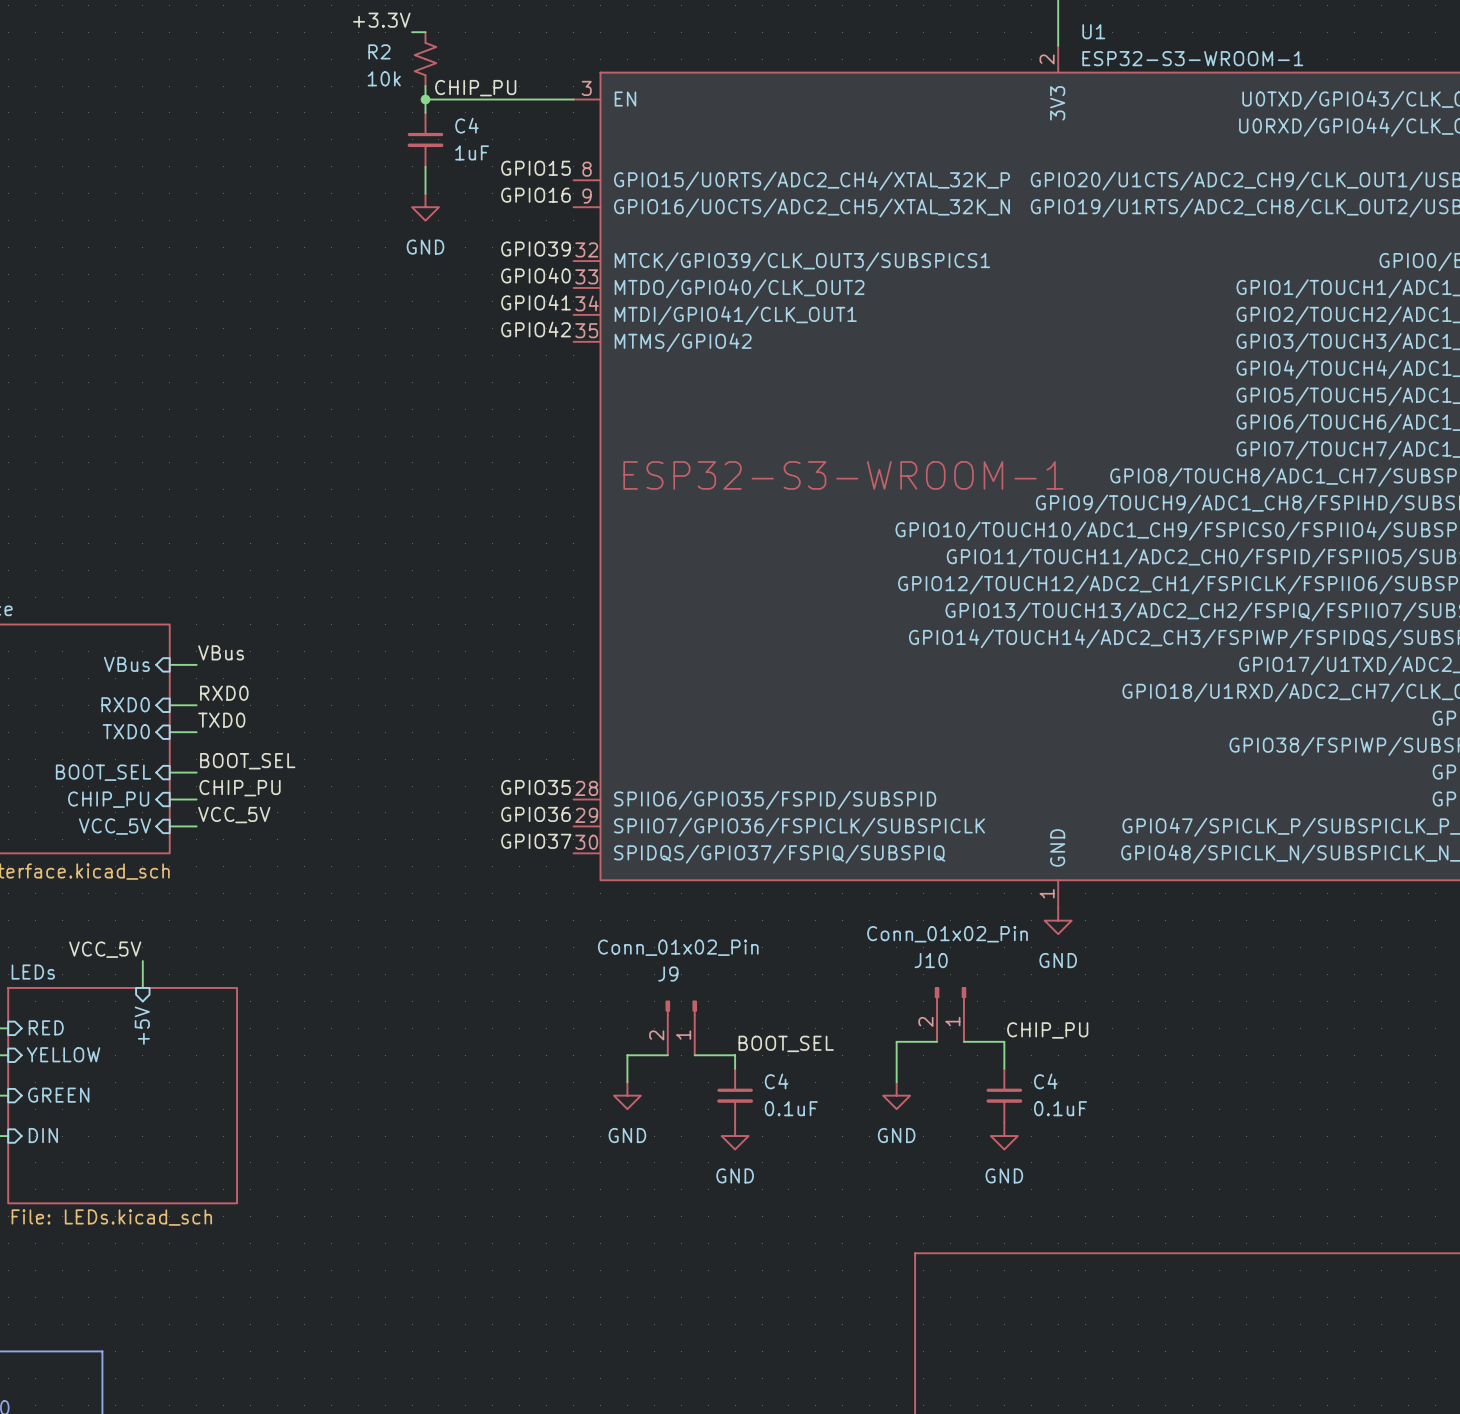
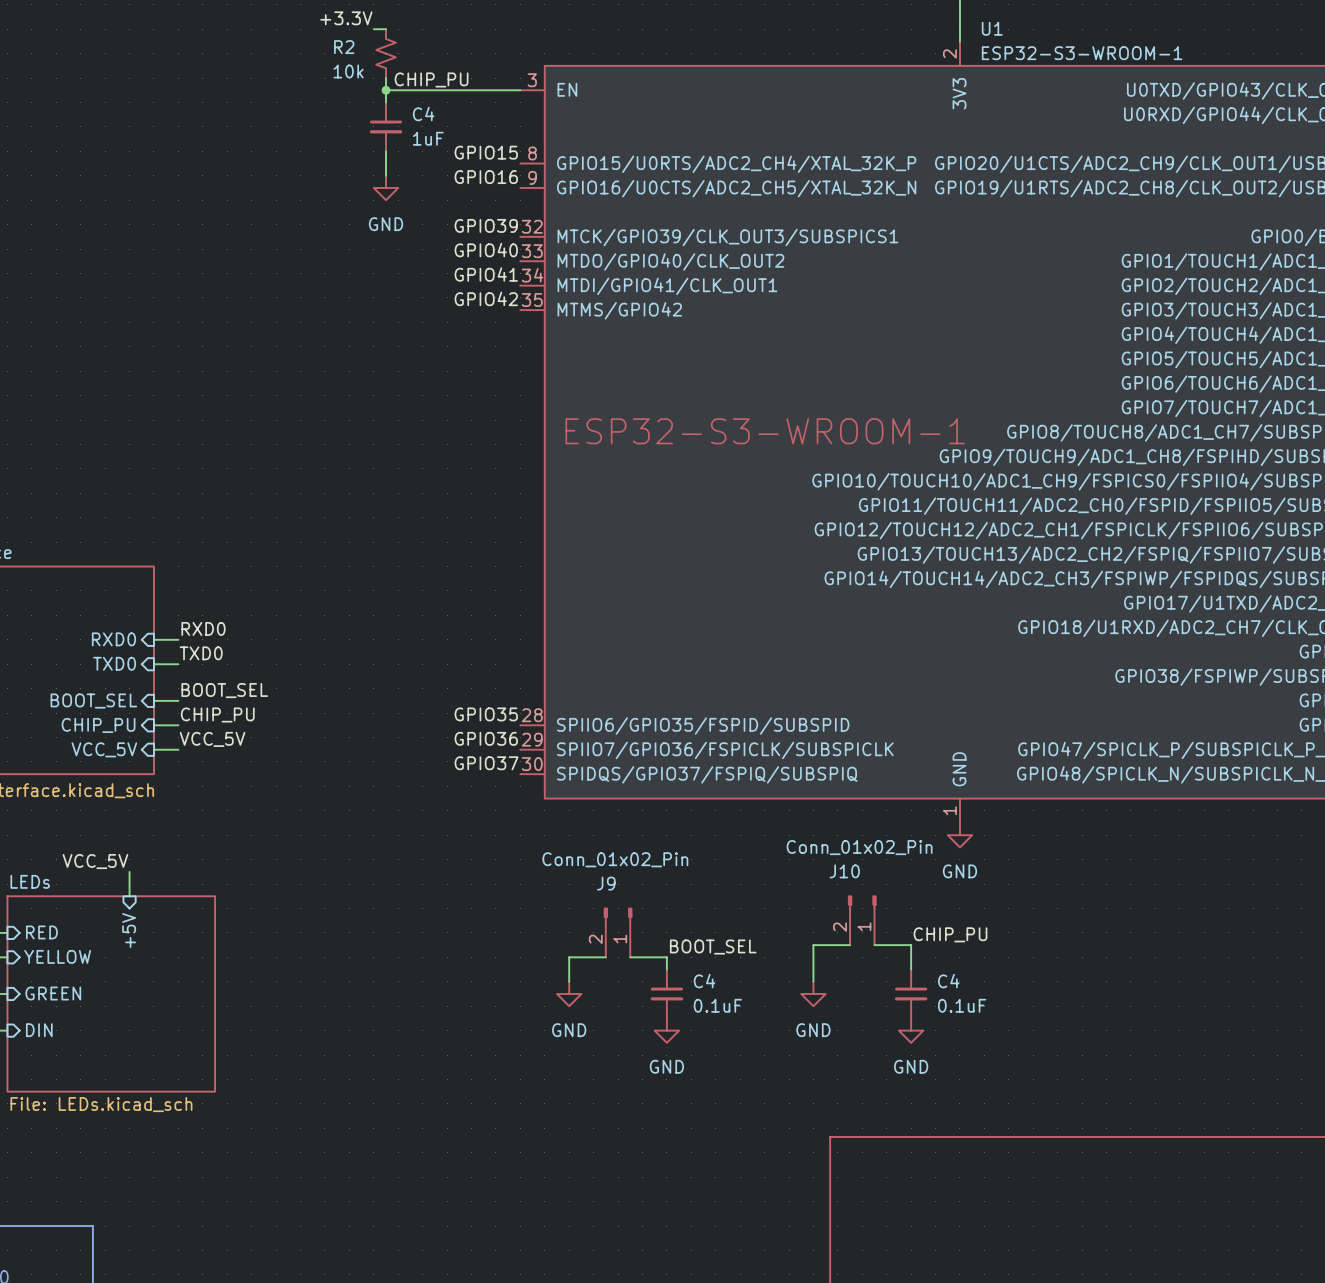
label: VBus (221, 652) -> none
sheet pin: VBus (126, 664) -> none
wire: (169, 664) (196, 664) -> none

